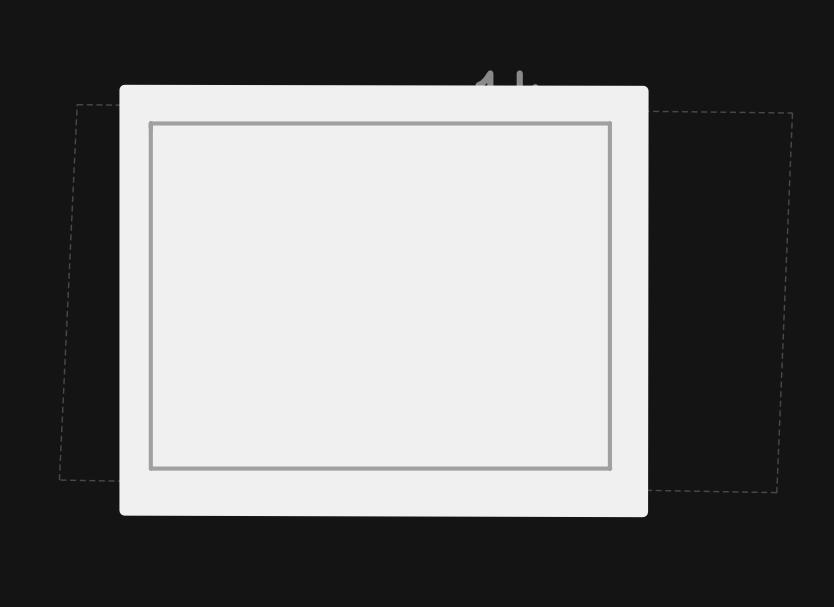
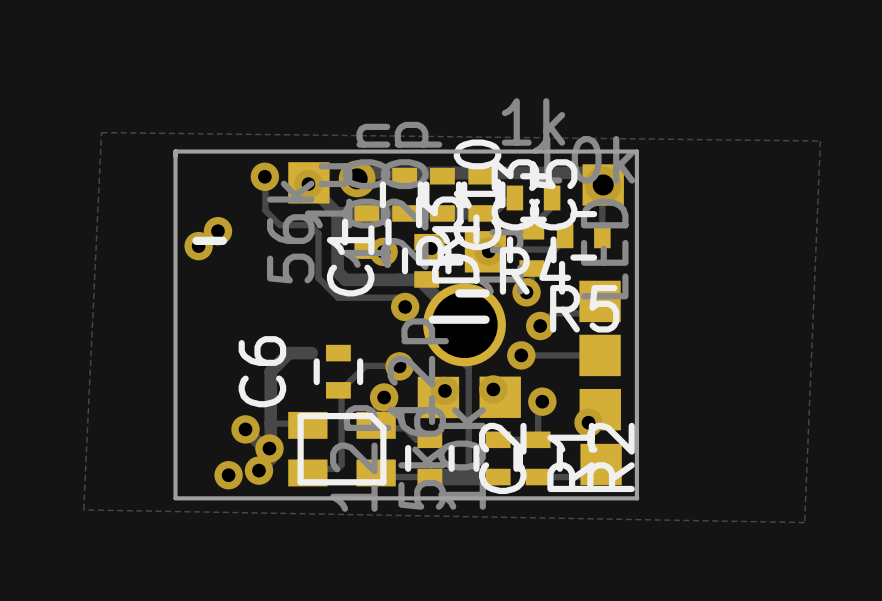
drawing: [119, 84, 649, 518] -> none

